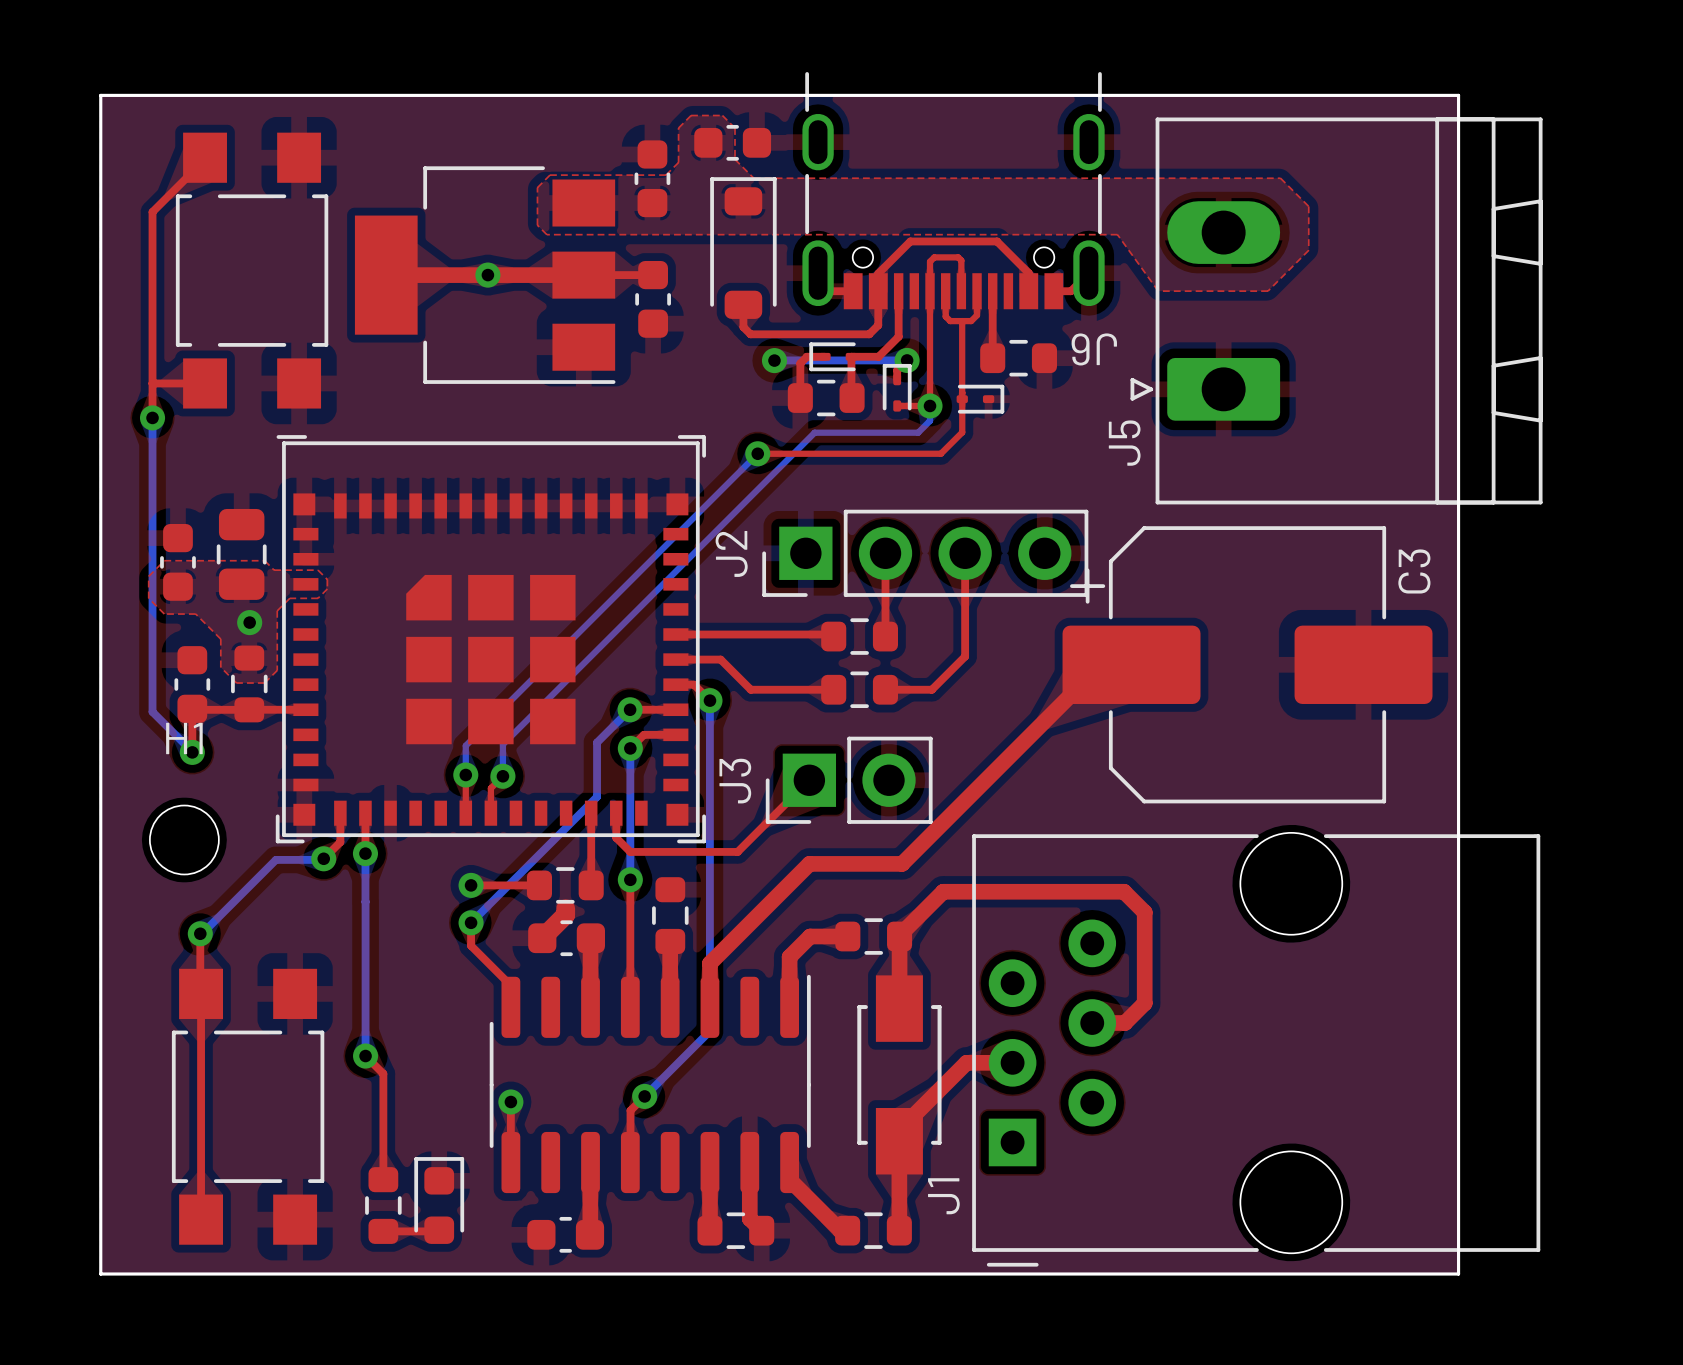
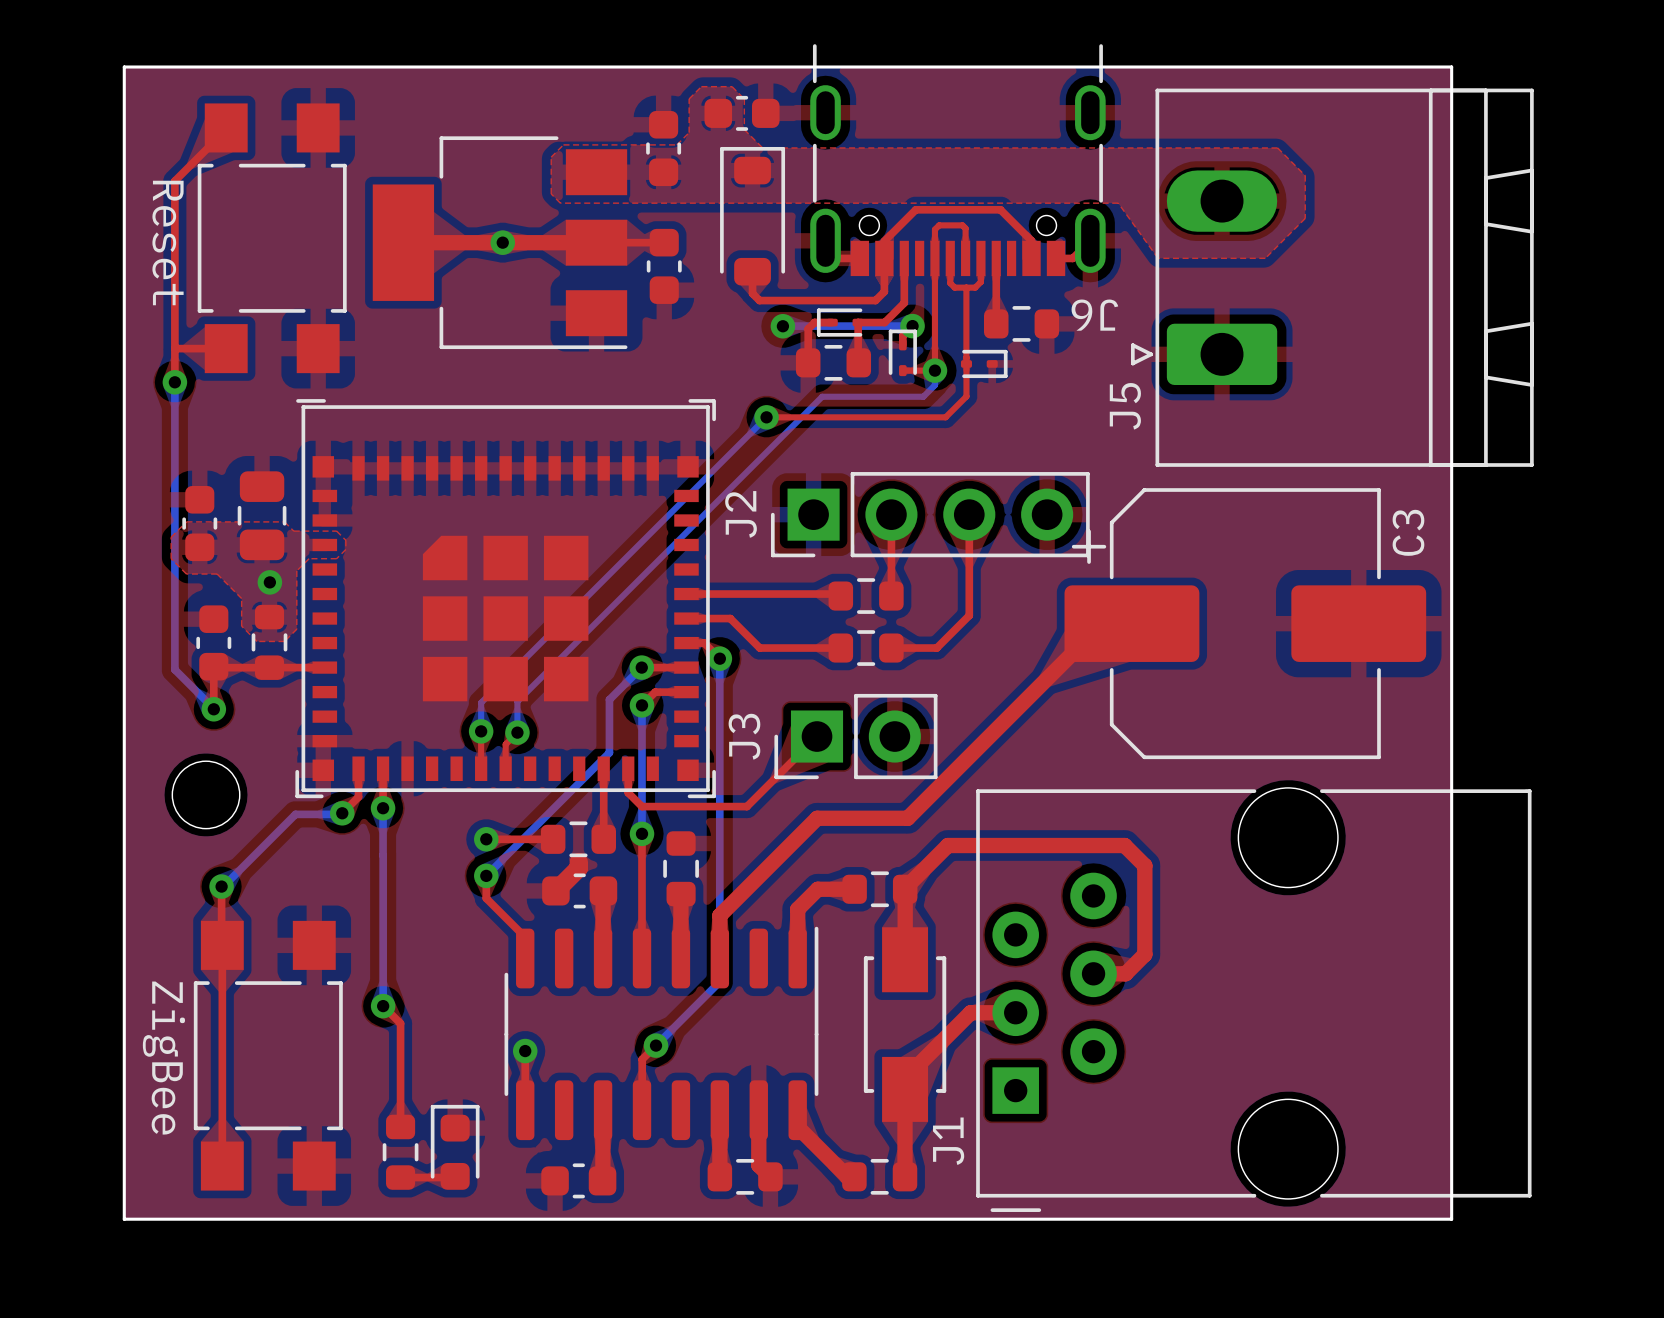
text: none -> Reset (168, 242)
H1 name: H1 (184, 738) -> none
text: none -> ZigBee (163, 1058)

